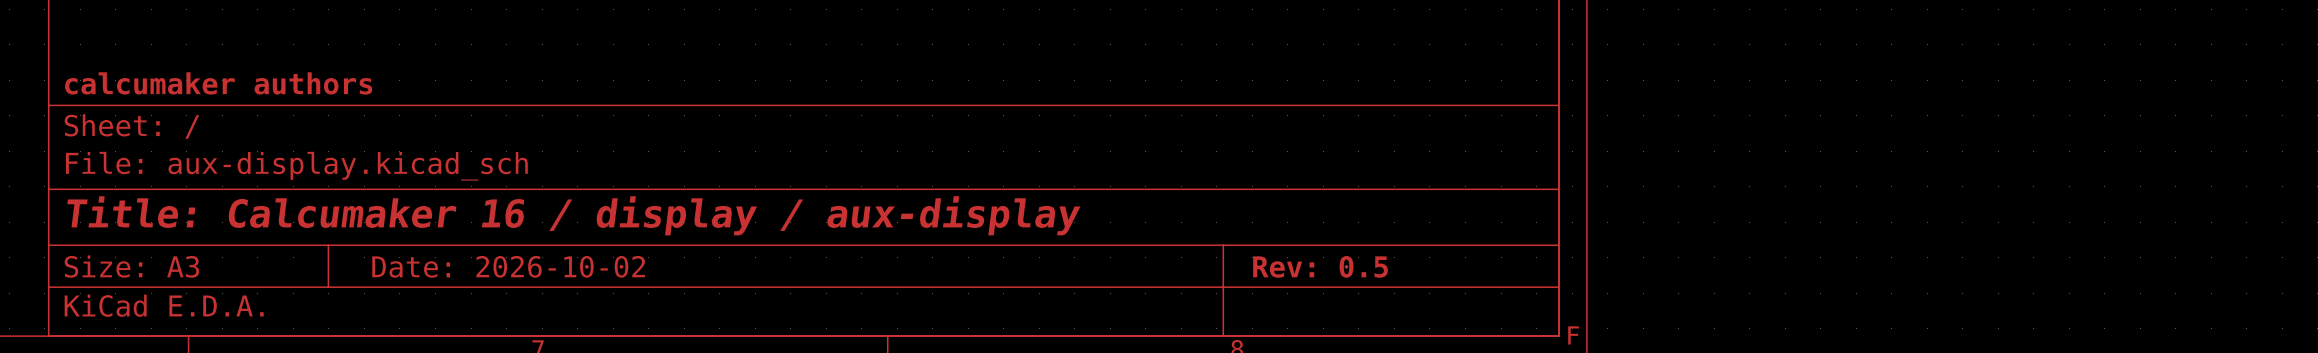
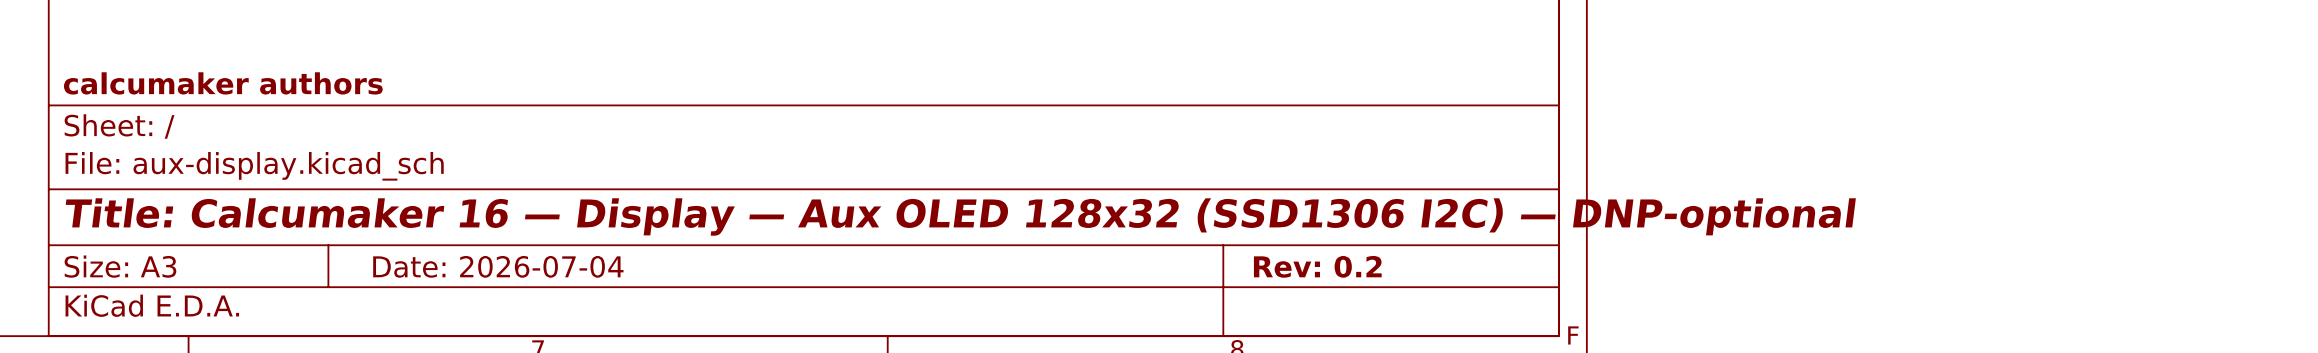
title block: Title: Calcumaker 16 / display / aux-display (573, 215) -> Title: Calcumaker 16 — Display — Aux OLED 128x32 (SSD1306 I2C) — DNP-optional (960, 216)
title block: Date: 2026-10-02 (508, 266) -> Date: 2026-07-04 (498, 266)
title block: Rev: 0.5 (1320, 266) -> Rev: 0.2 (1317, 266)

